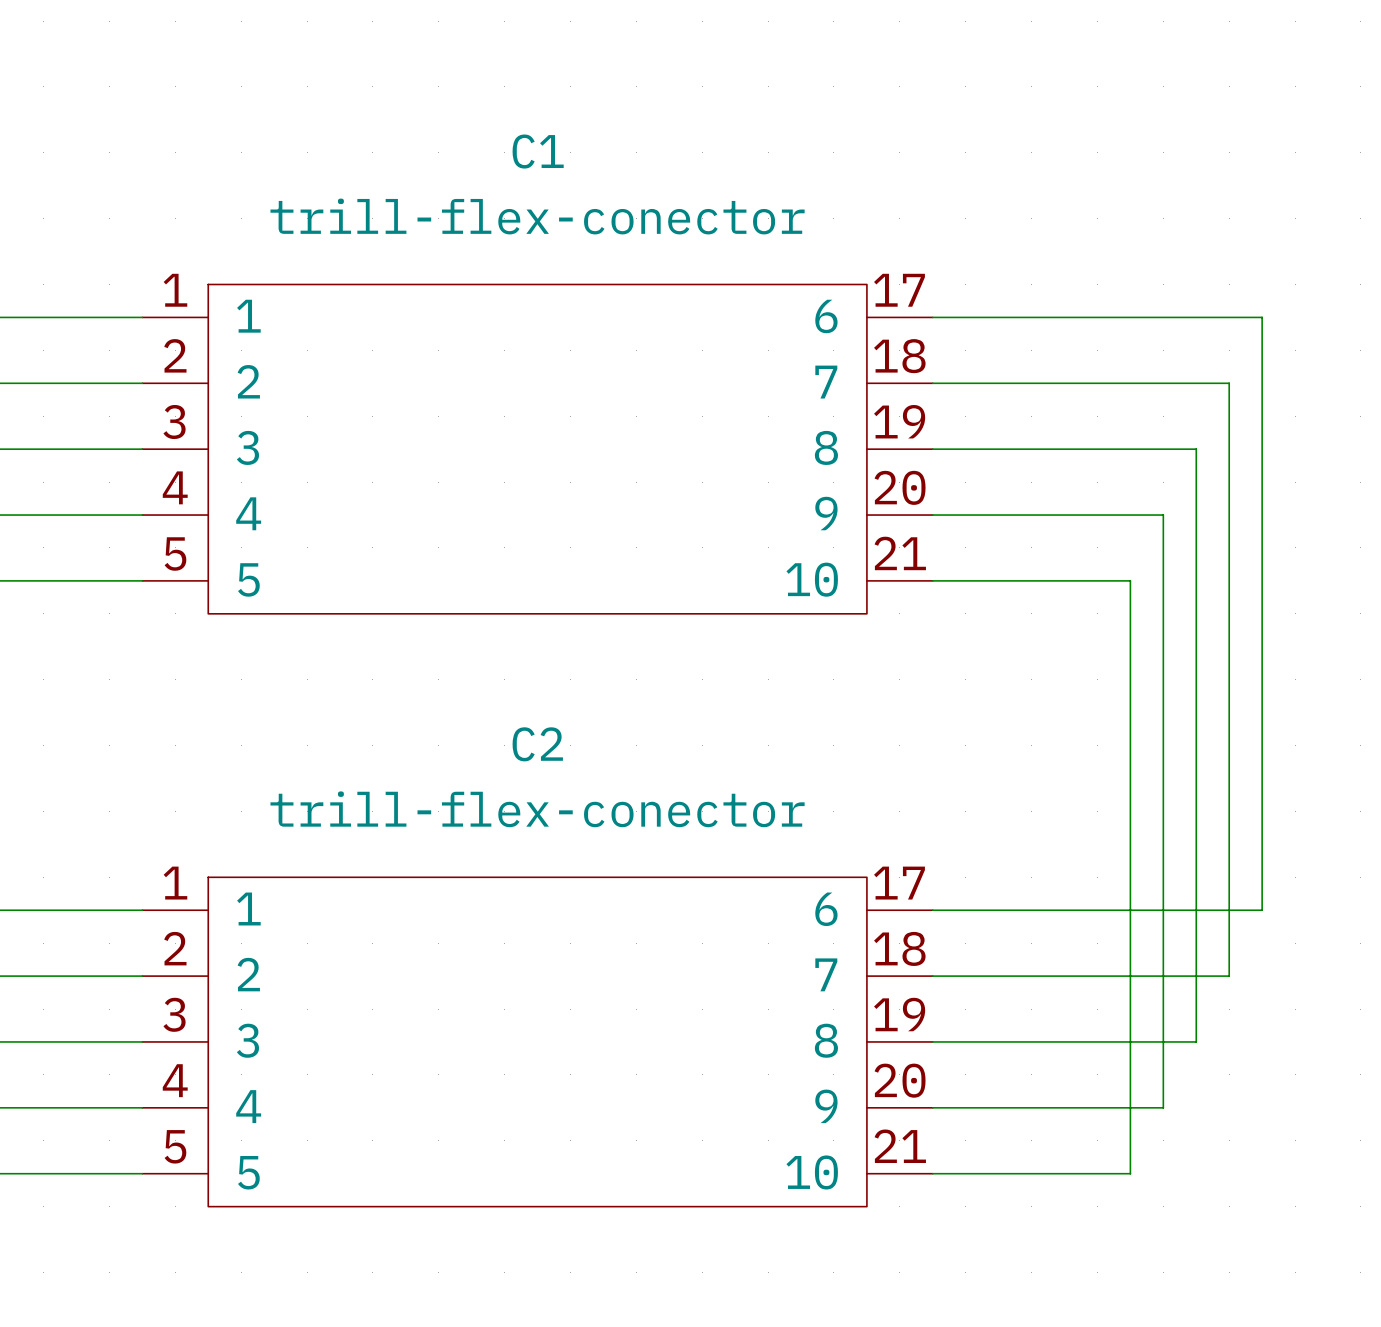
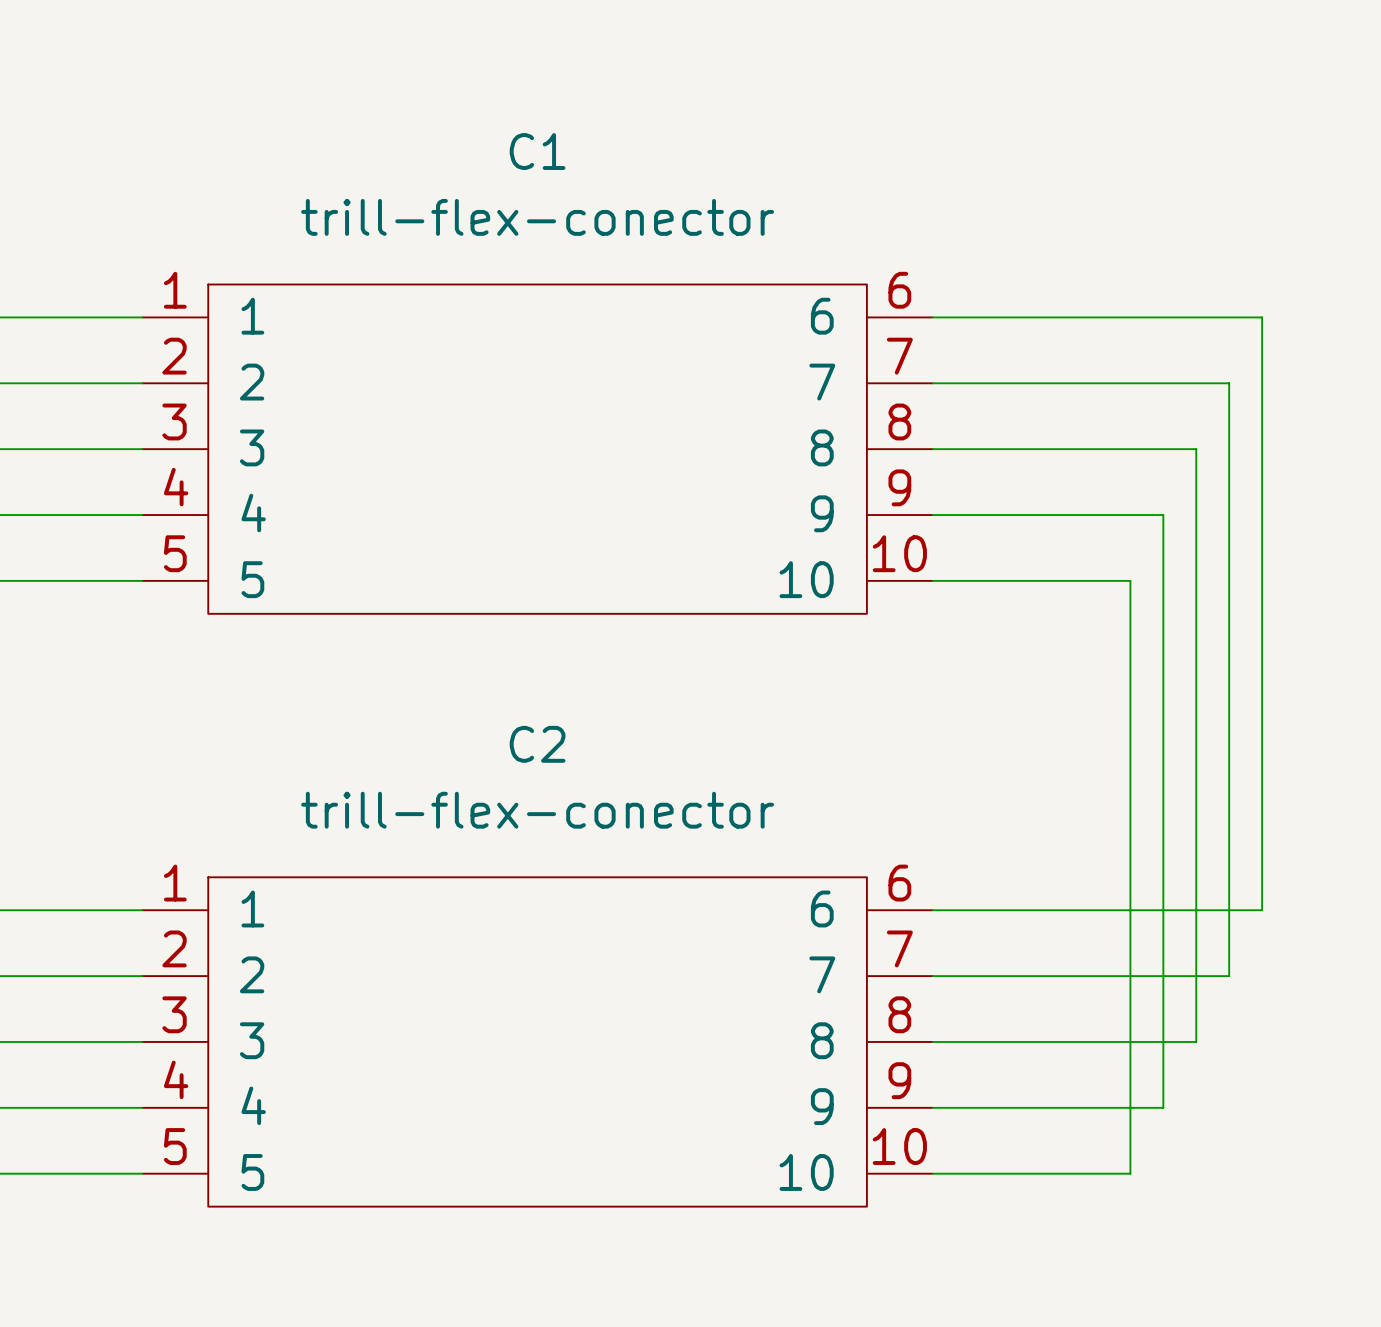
C1 pin number: 17 (899, 290) -> 6 (899, 290)
C1 pin number: 18 (899, 356) -> 7 (899, 356)
C1 pin number: 19 (899, 421) -> 8 (899, 421)
C1 pin number: 20 (900, 487) -> 9 (899, 487)
C1 pin number: 21 (900, 553) -> 10 (899, 553)
C2 pin number: 17 (899, 883) -> 6 (899, 883)
C2 pin number: 18 (899, 948) -> 7 (899, 948)
C2 pin number: 19 (899, 1014) -> 8 (899, 1014)
C2 pin number: 20 (900, 1080) -> 9 (899, 1080)
C2 pin number: 21 (900, 1146) -> 10 (899, 1146)

